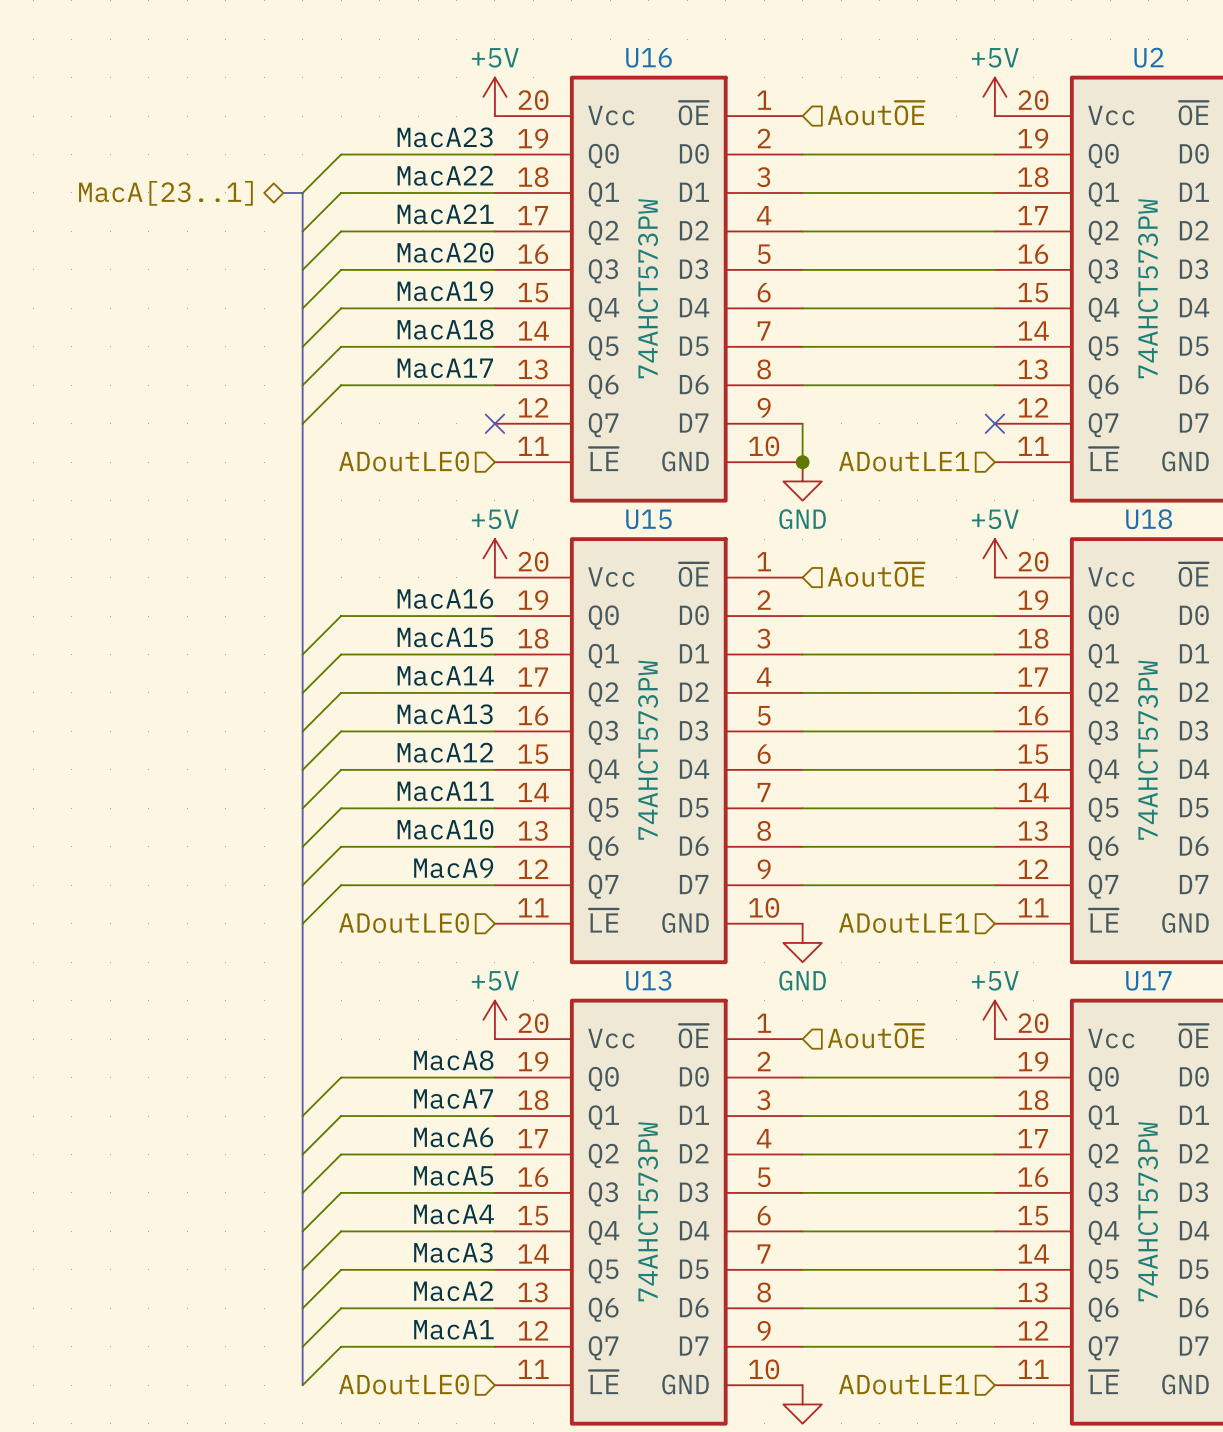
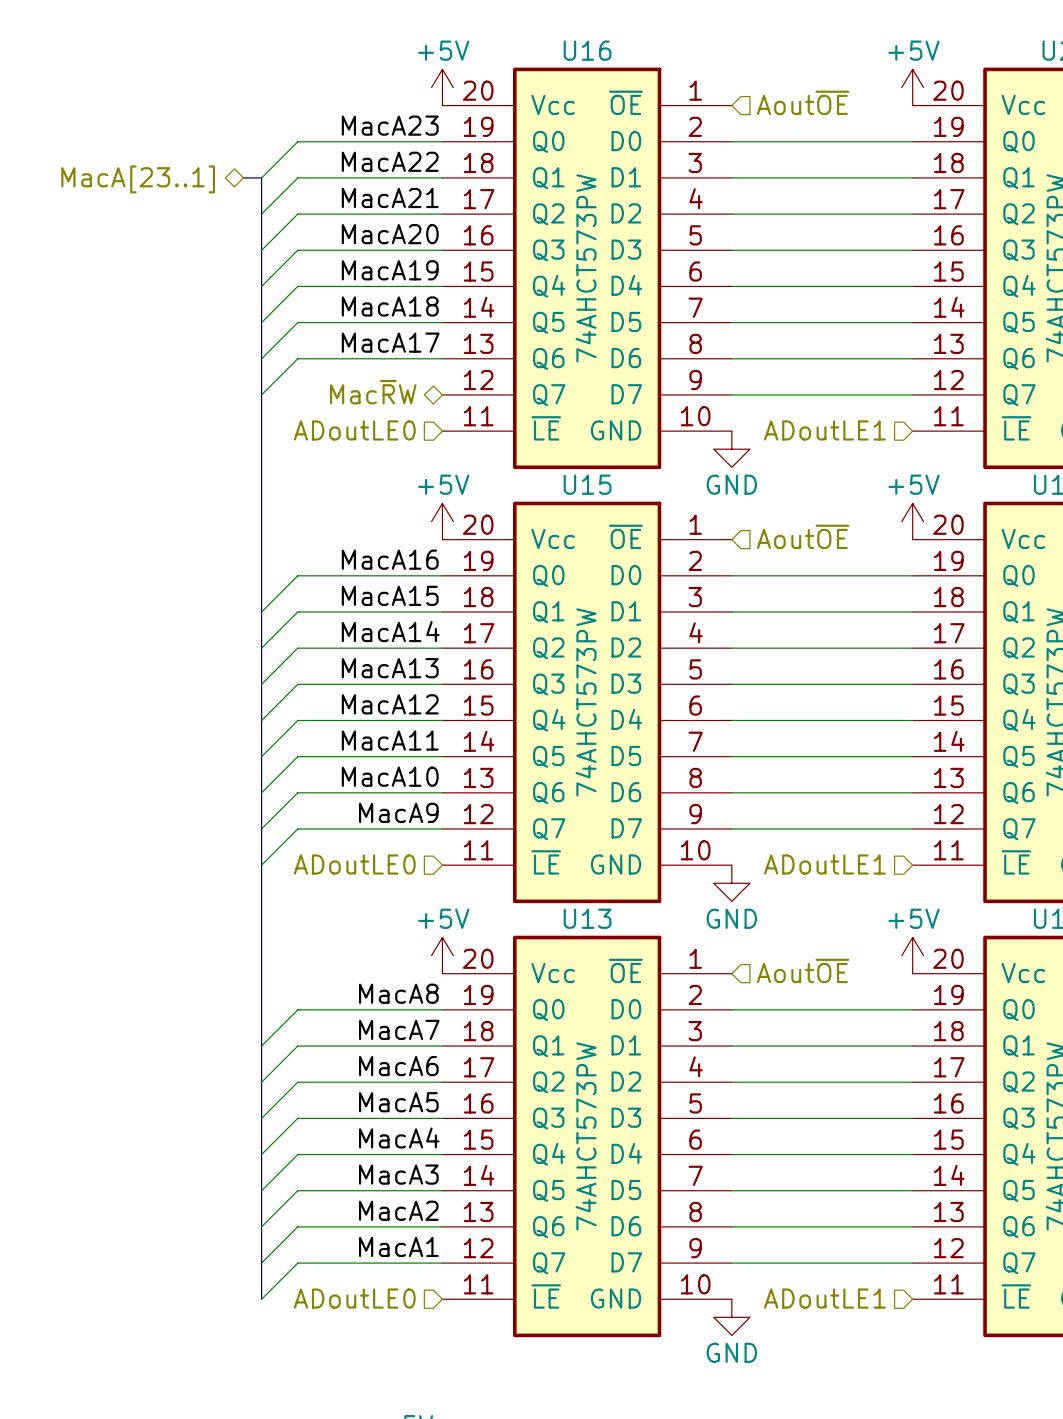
hierarchical label: none -> Mac~{R}W (373, 392)
no-connect mark: (494, 423) -> none
wire: (802, 423) (802, 462) -> (731, 394) (912, 394)
no-connect mark: (994, 423) -> none
junction: (802, 462) -> none

